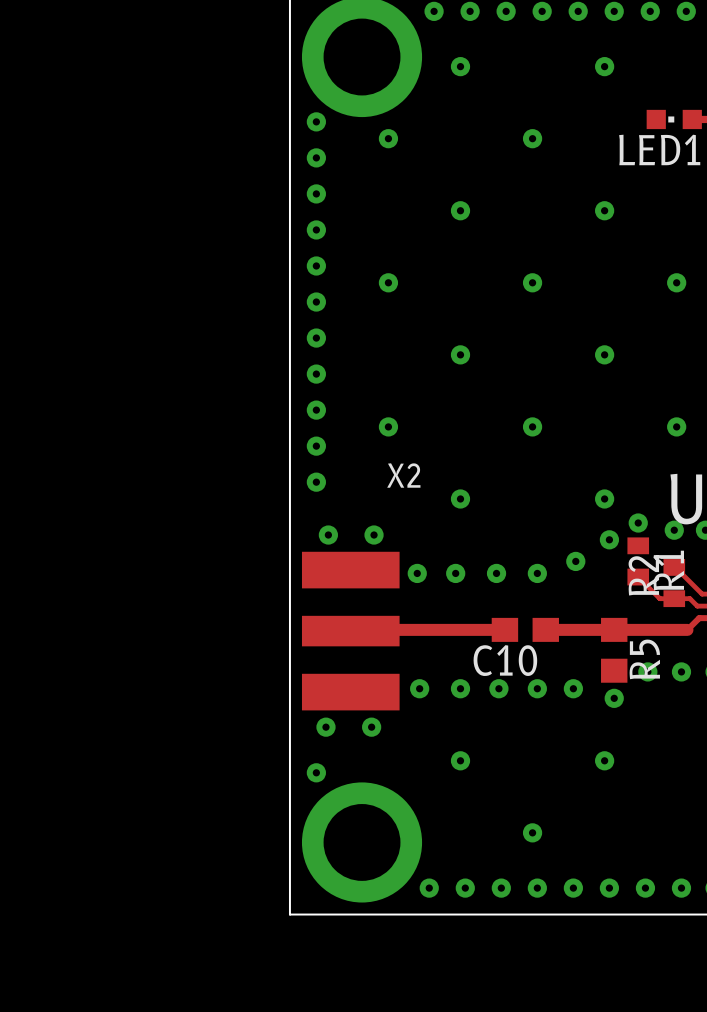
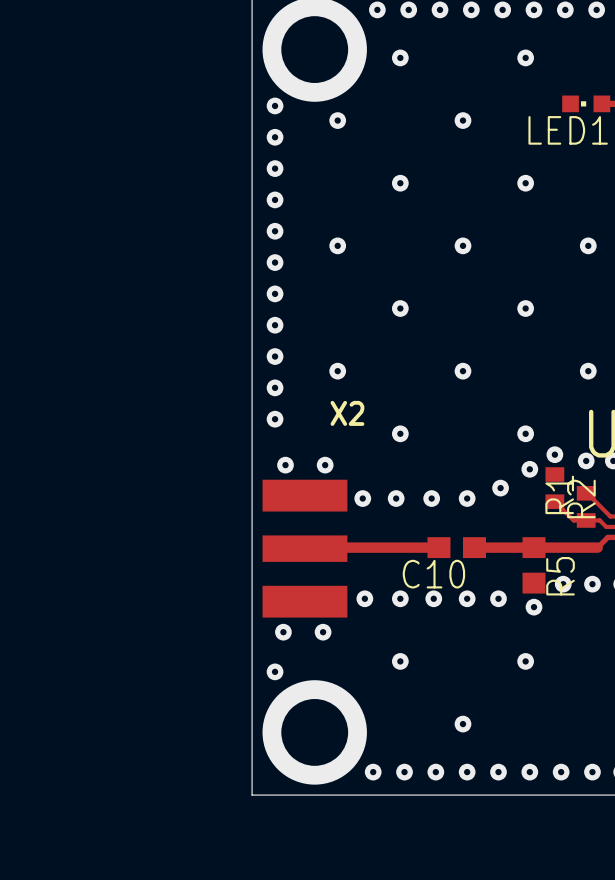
R1 name: R1 (668, 570) -> R2 (581, 498)
R2 name: R2 (643, 575) -> R1 (559, 494)

